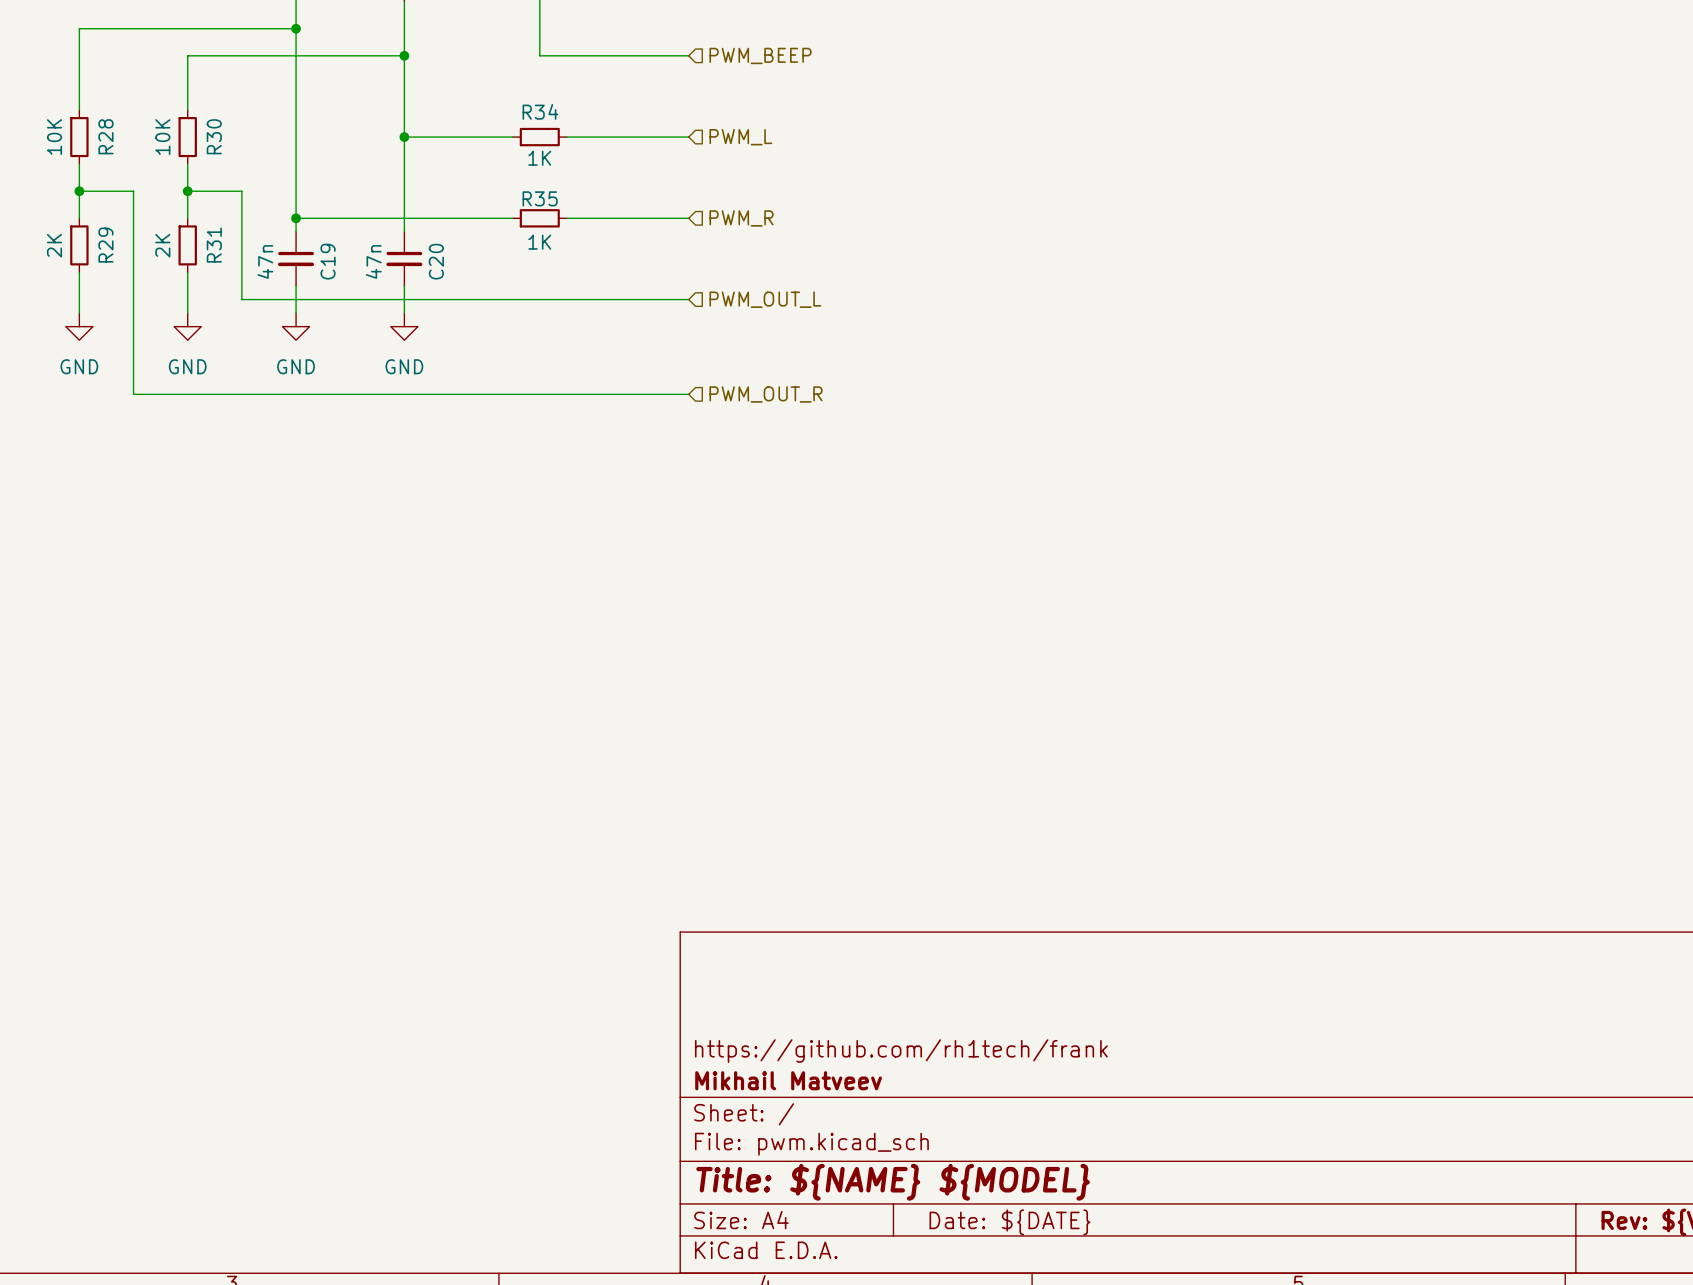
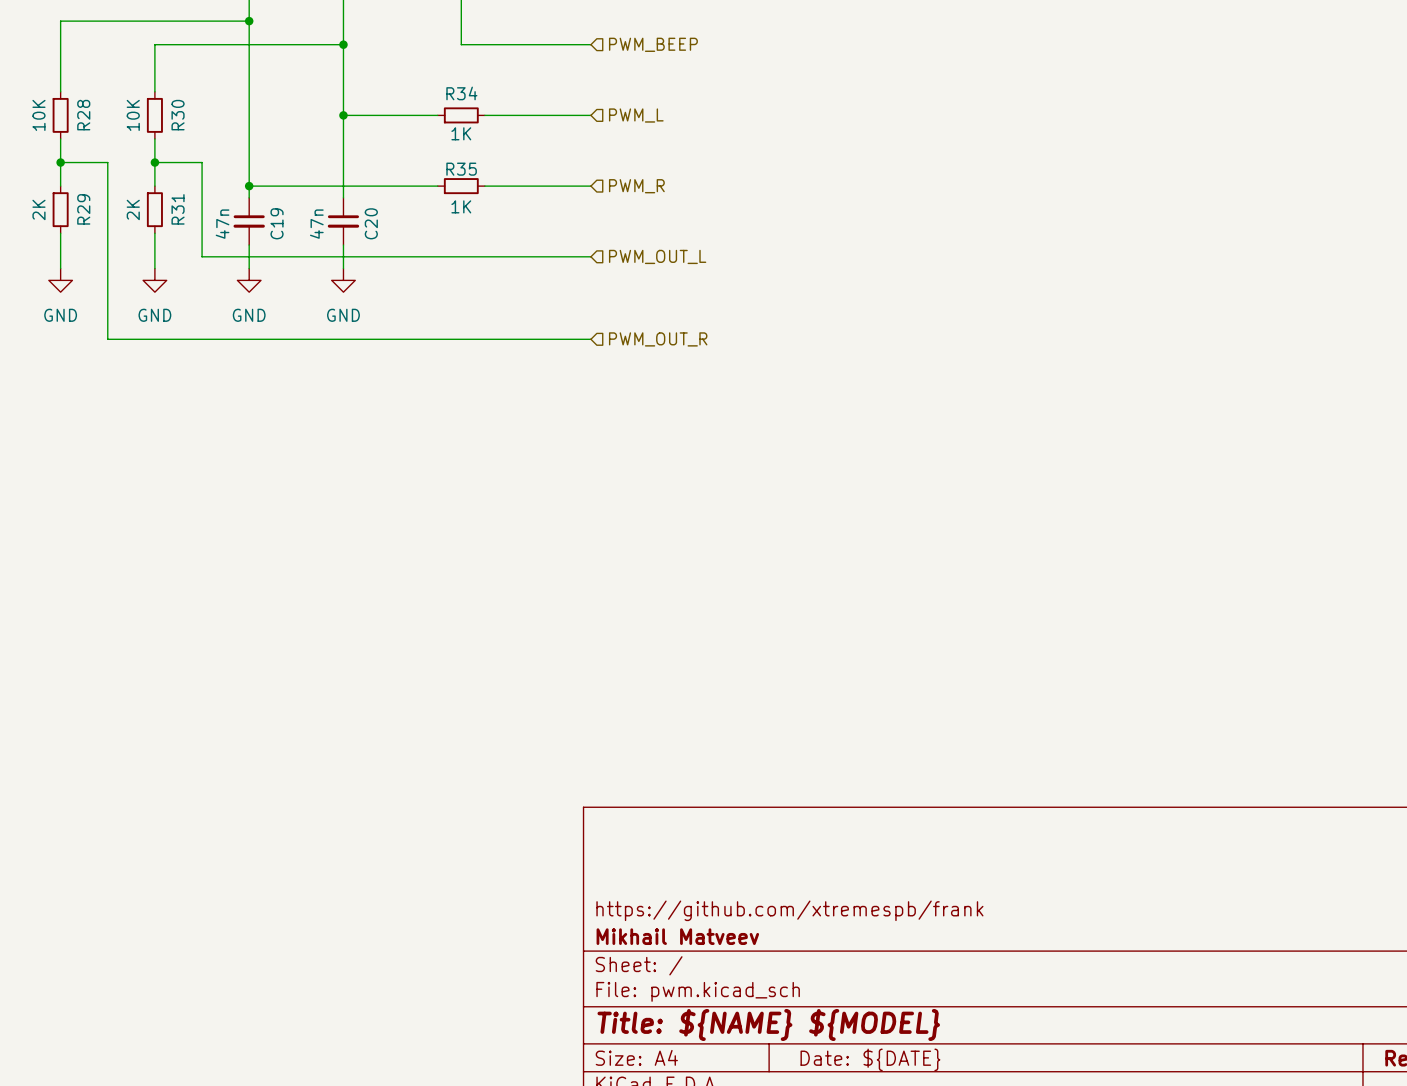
title block: https://github.com/rh1tech/frank (901, 1051) -> https://github.com/xtremespb/frank (789, 910)

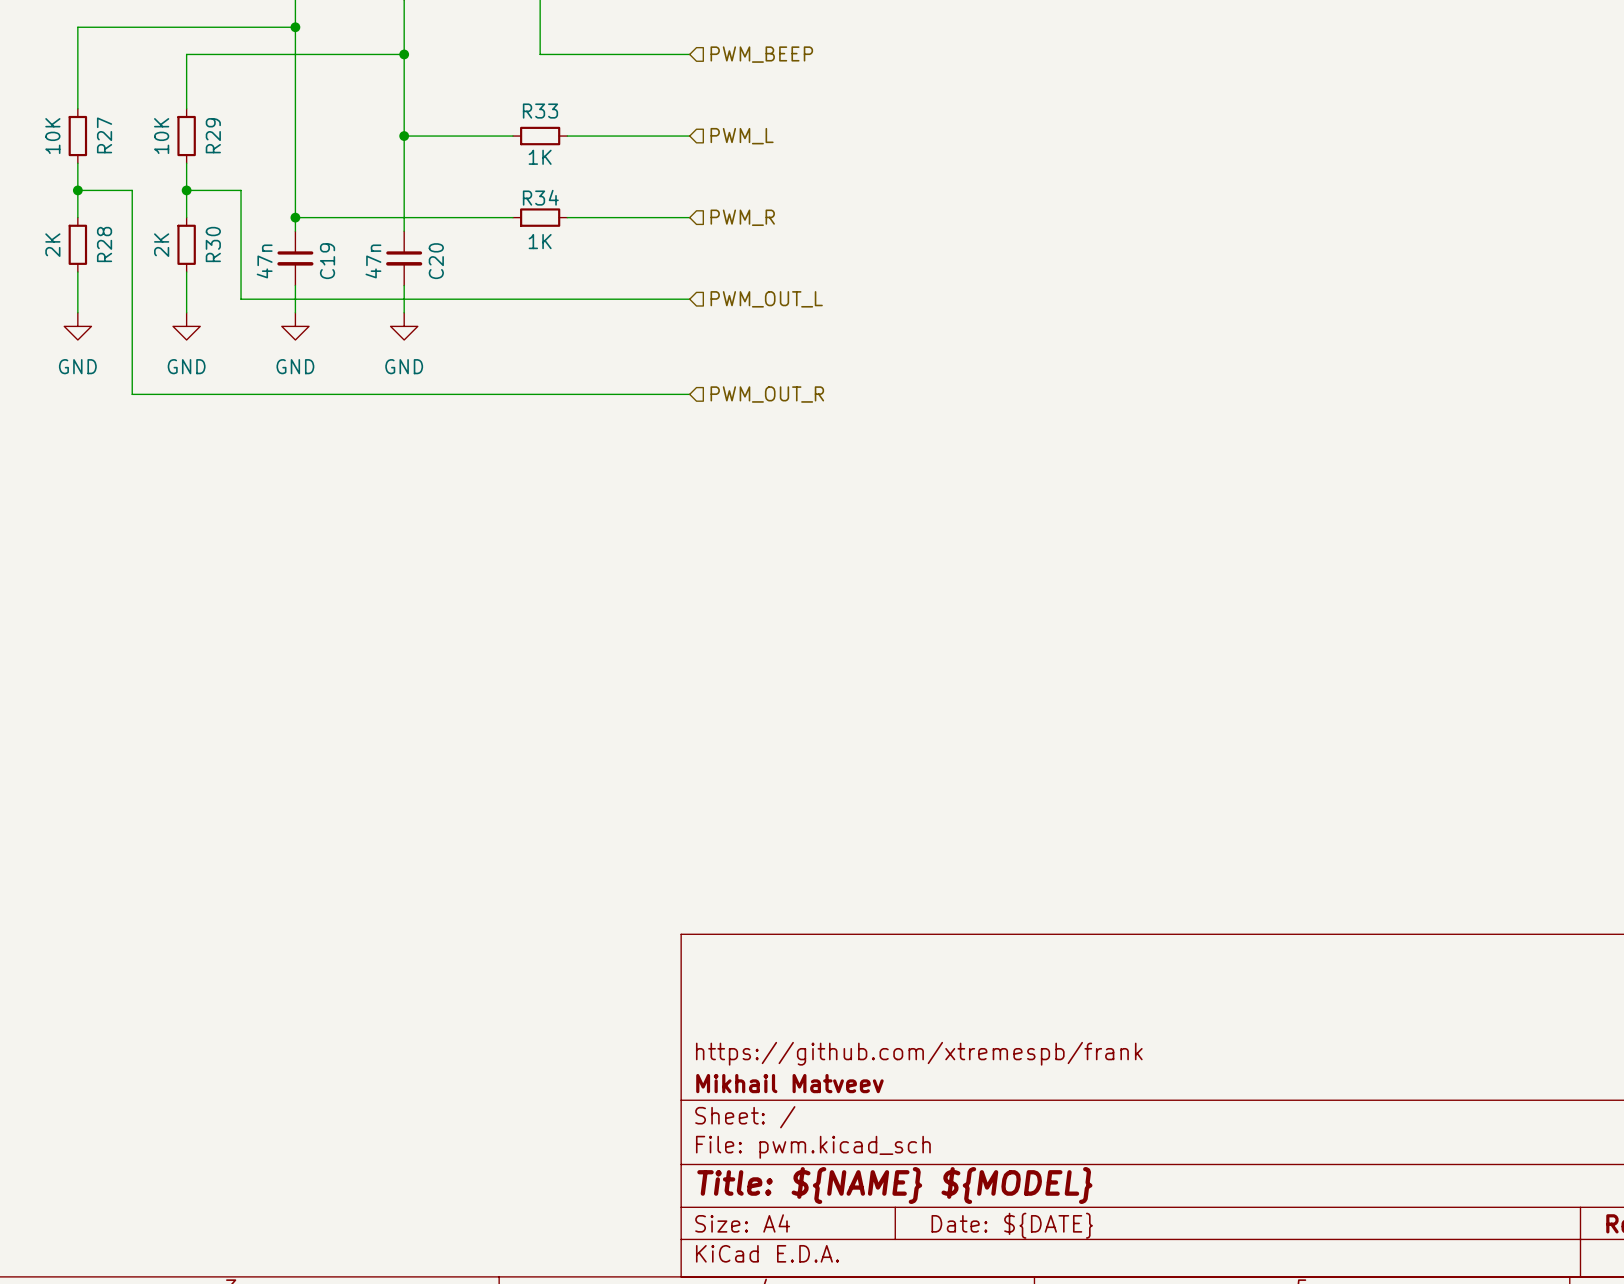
R34 name: R34 (461, 93) -> R33 (540, 111)
R28 name: R28 (83, 115) -> R27 (104, 135)
R30 name: R30 (178, 115) -> R29 (213, 135)
R35 name: R35 (461, 169) -> R34 (540, 197)
R29 name: R29 (83, 209) -> R28 (104, 244)
R31 name: R31 (178, 209) -> R30 (213, 244)

